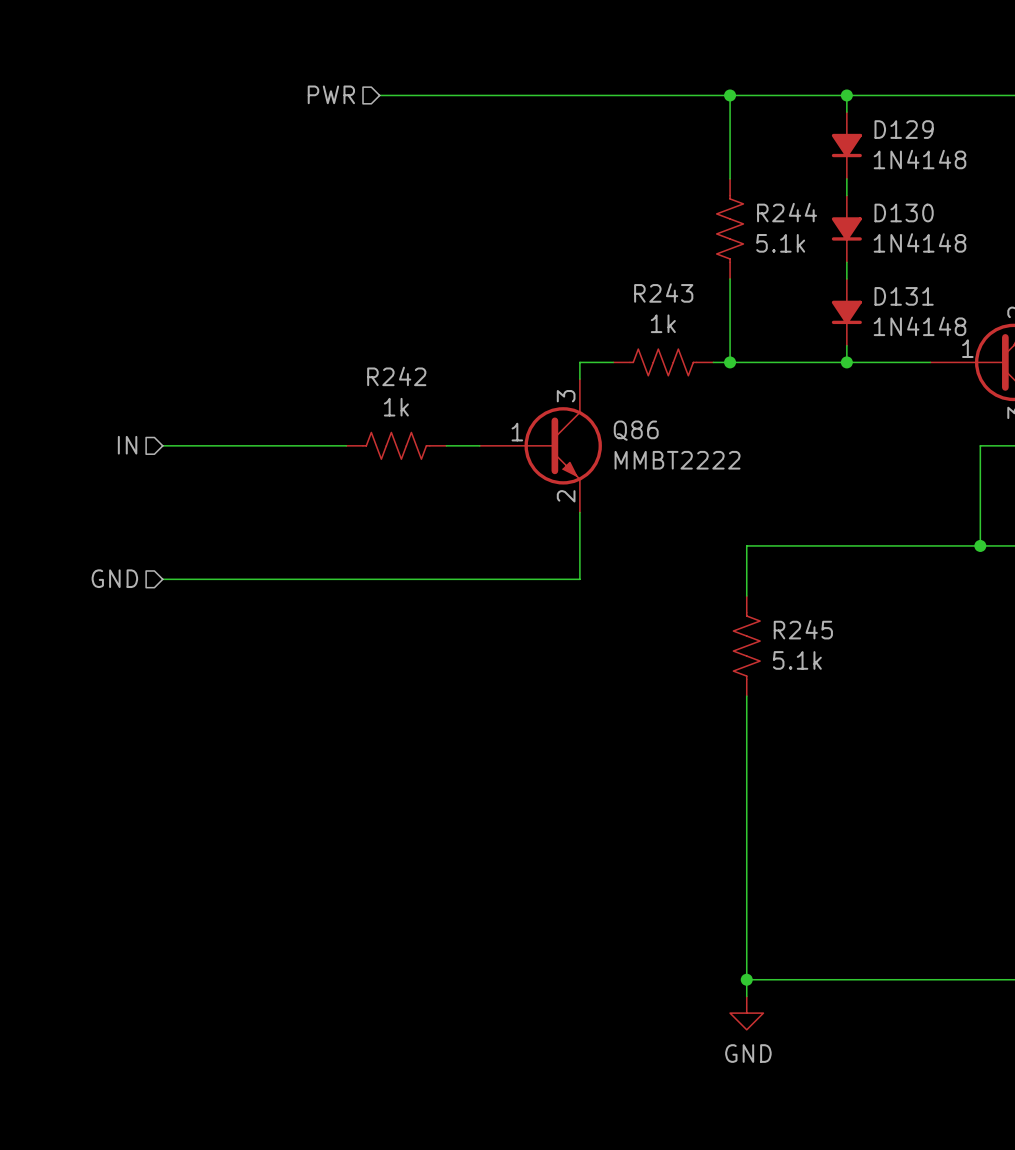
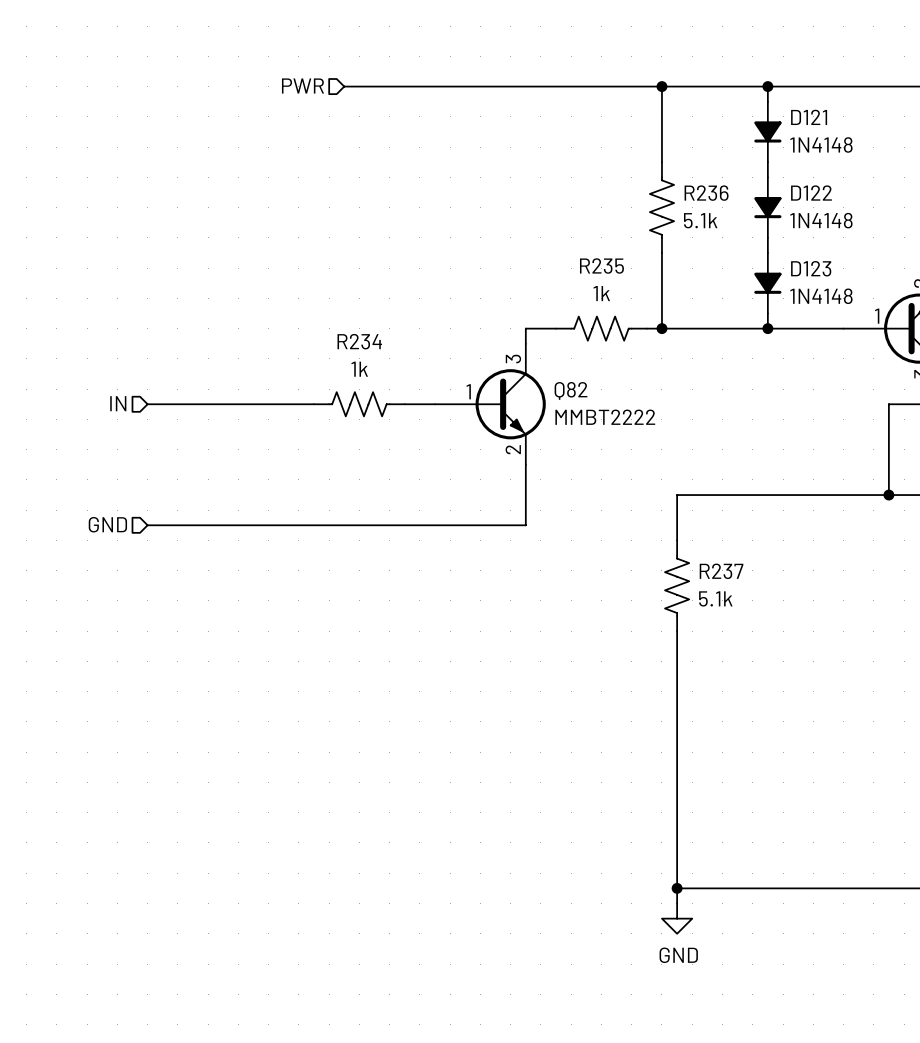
D129 name: D129 (904, 129) -> D121 (809, 117)
R244 name: R244 (787, 212) -> R236 (706, 193)
D130 name: D130 (904, 212) -> D122 (811, 193)
R243 name: R243 (663, 292) -> R235 (601, 266)
D131 name: D131 (904, 296) -> D123 (811, 268)
R242 name: R242 (396, 376) -> R234 (359, 341)
Q86 name: Q86 (636, 430) -> Q82 (571, 390)
R245 name: R245 (803, 629) -> R237 (721, 571)

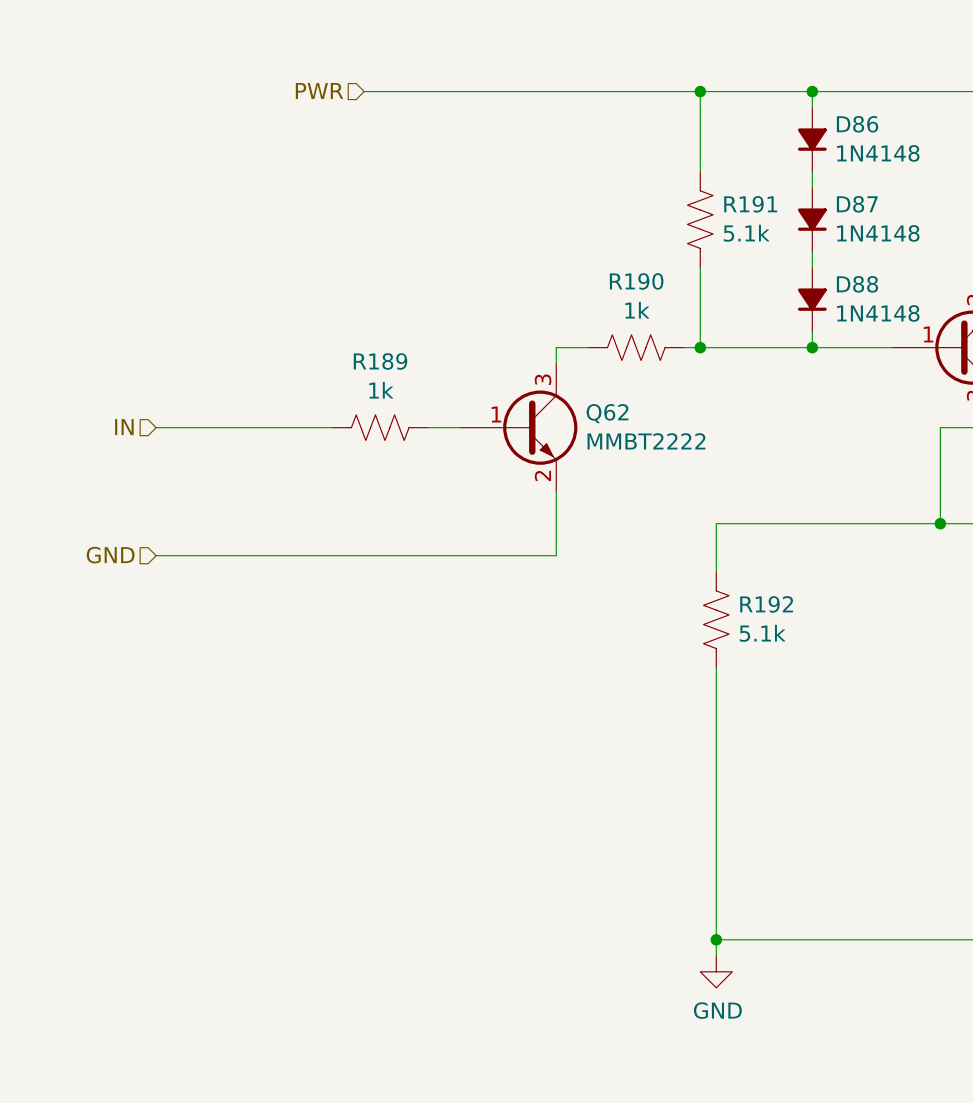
D121 name: D121 (809, 117) -> D86 (857, 124)
R236 name: R236 (706, 193) -> R191 (750, 204)
D122 name: D122 (811, 193) -> D87 (857, 204)
R235 name: R235 (601, 266) -> R190 (636, 281)
D123 name: D123 (811, 268) -> D88 (857, 284)
R234 name: R234 (359, 341) -> R189 (380, 361)
Q82 name: Q82 (571, 390) -> Q62 (607, 413)
R237 name: R237 (721, 571) -> R192 (766, 604)

